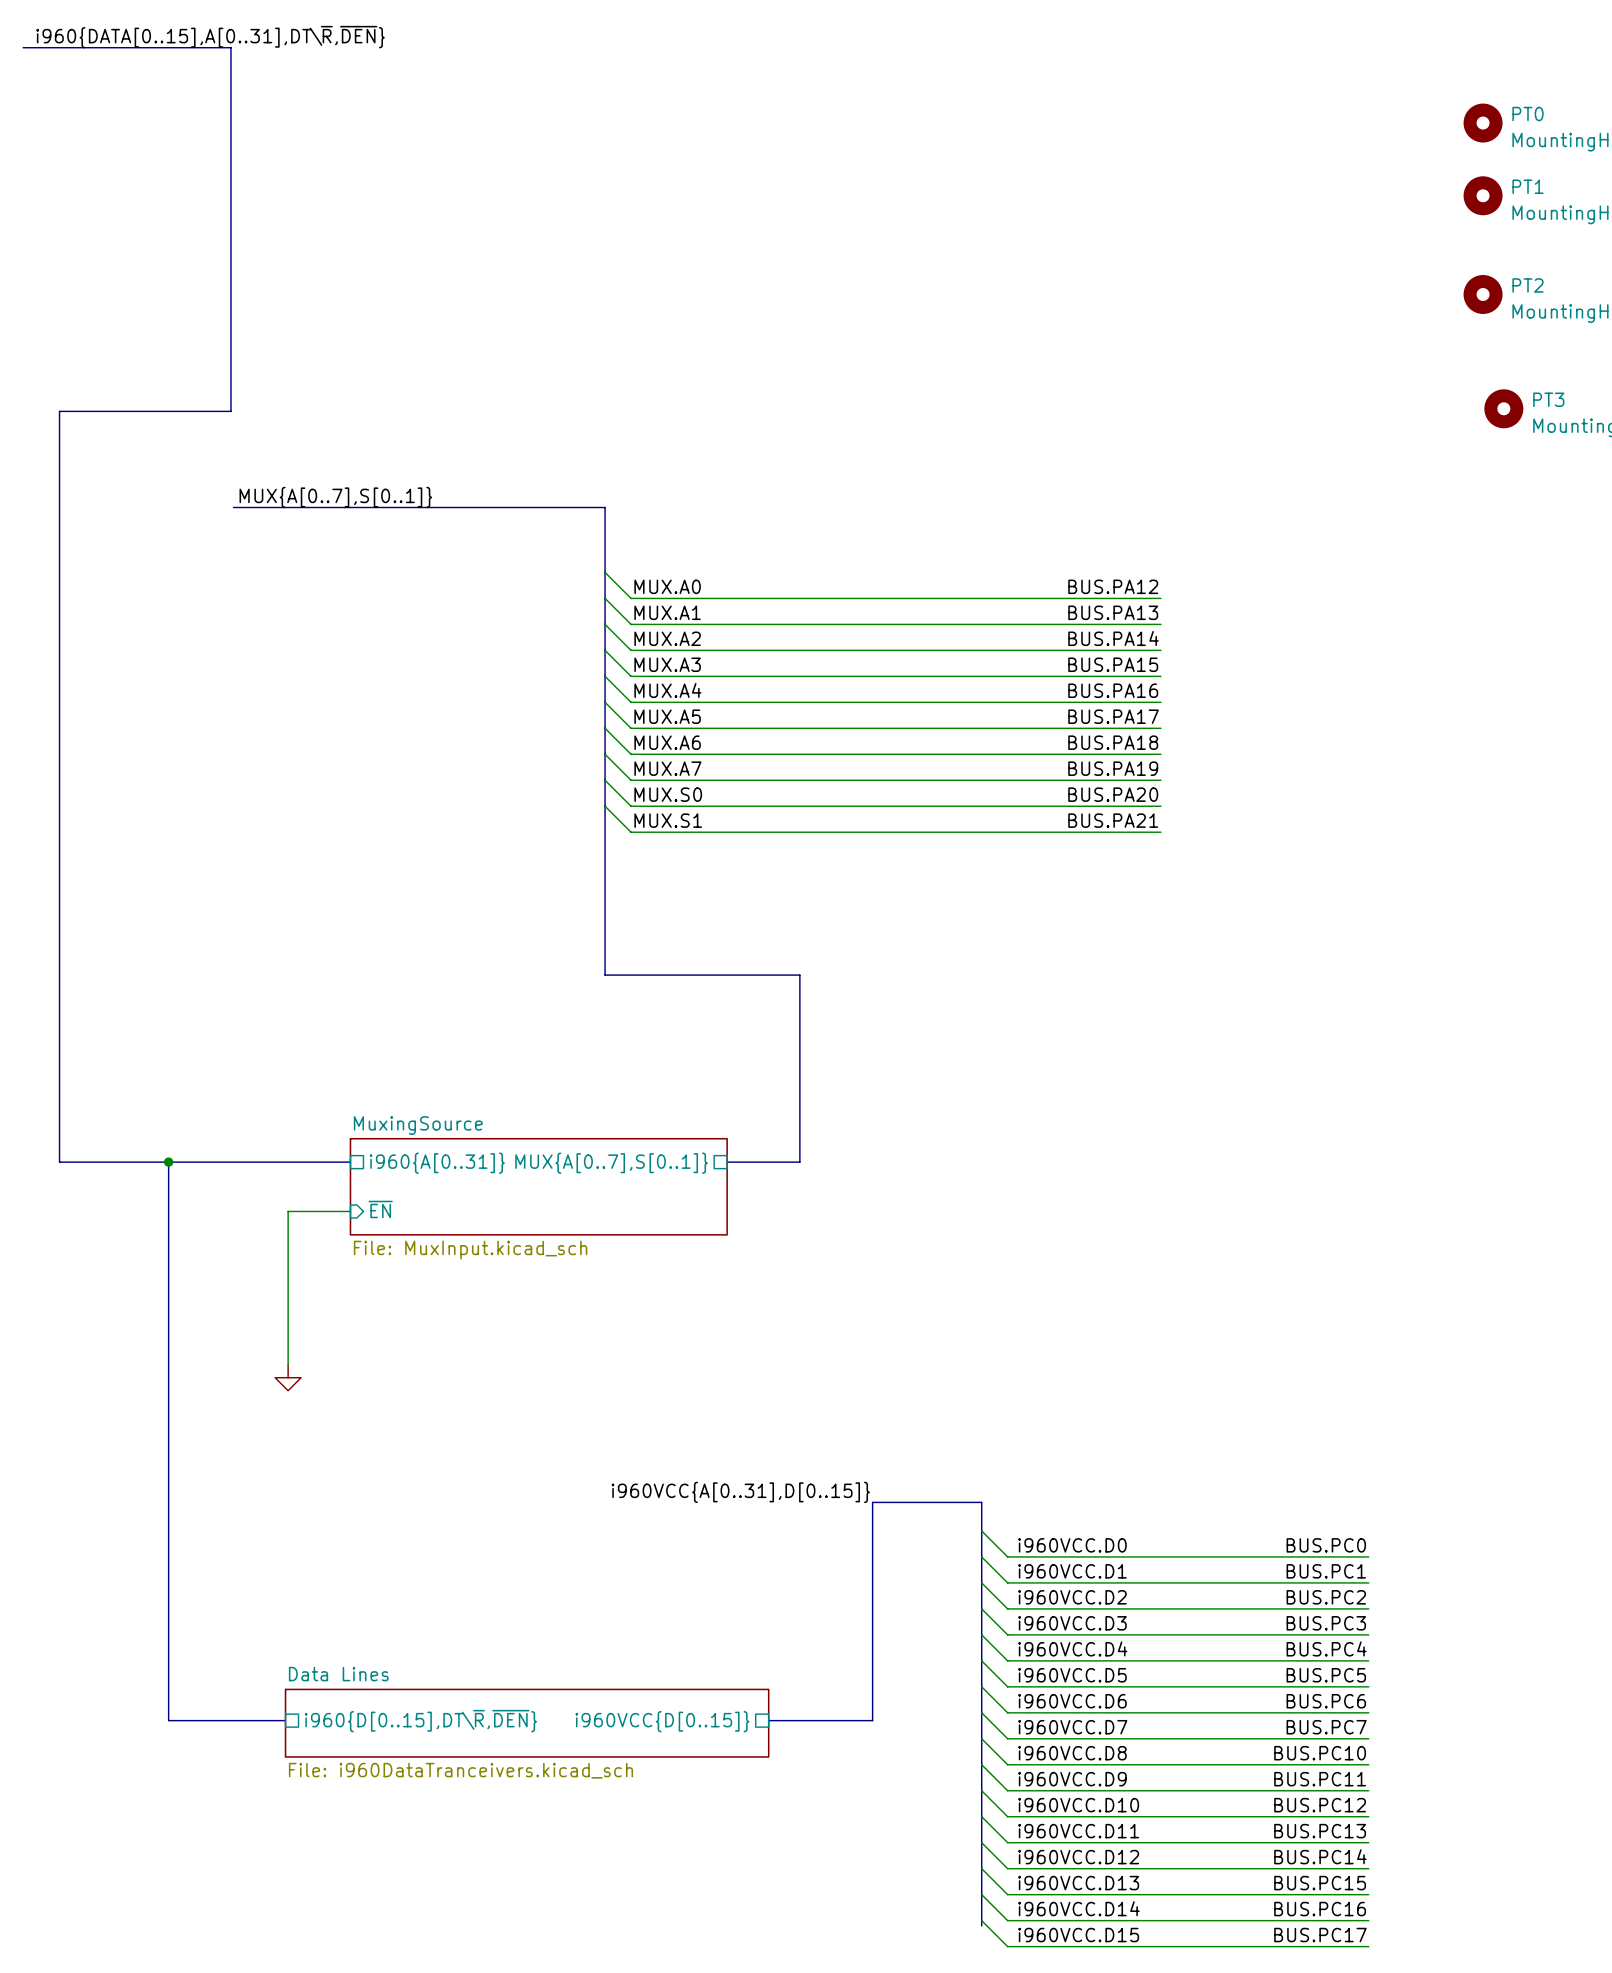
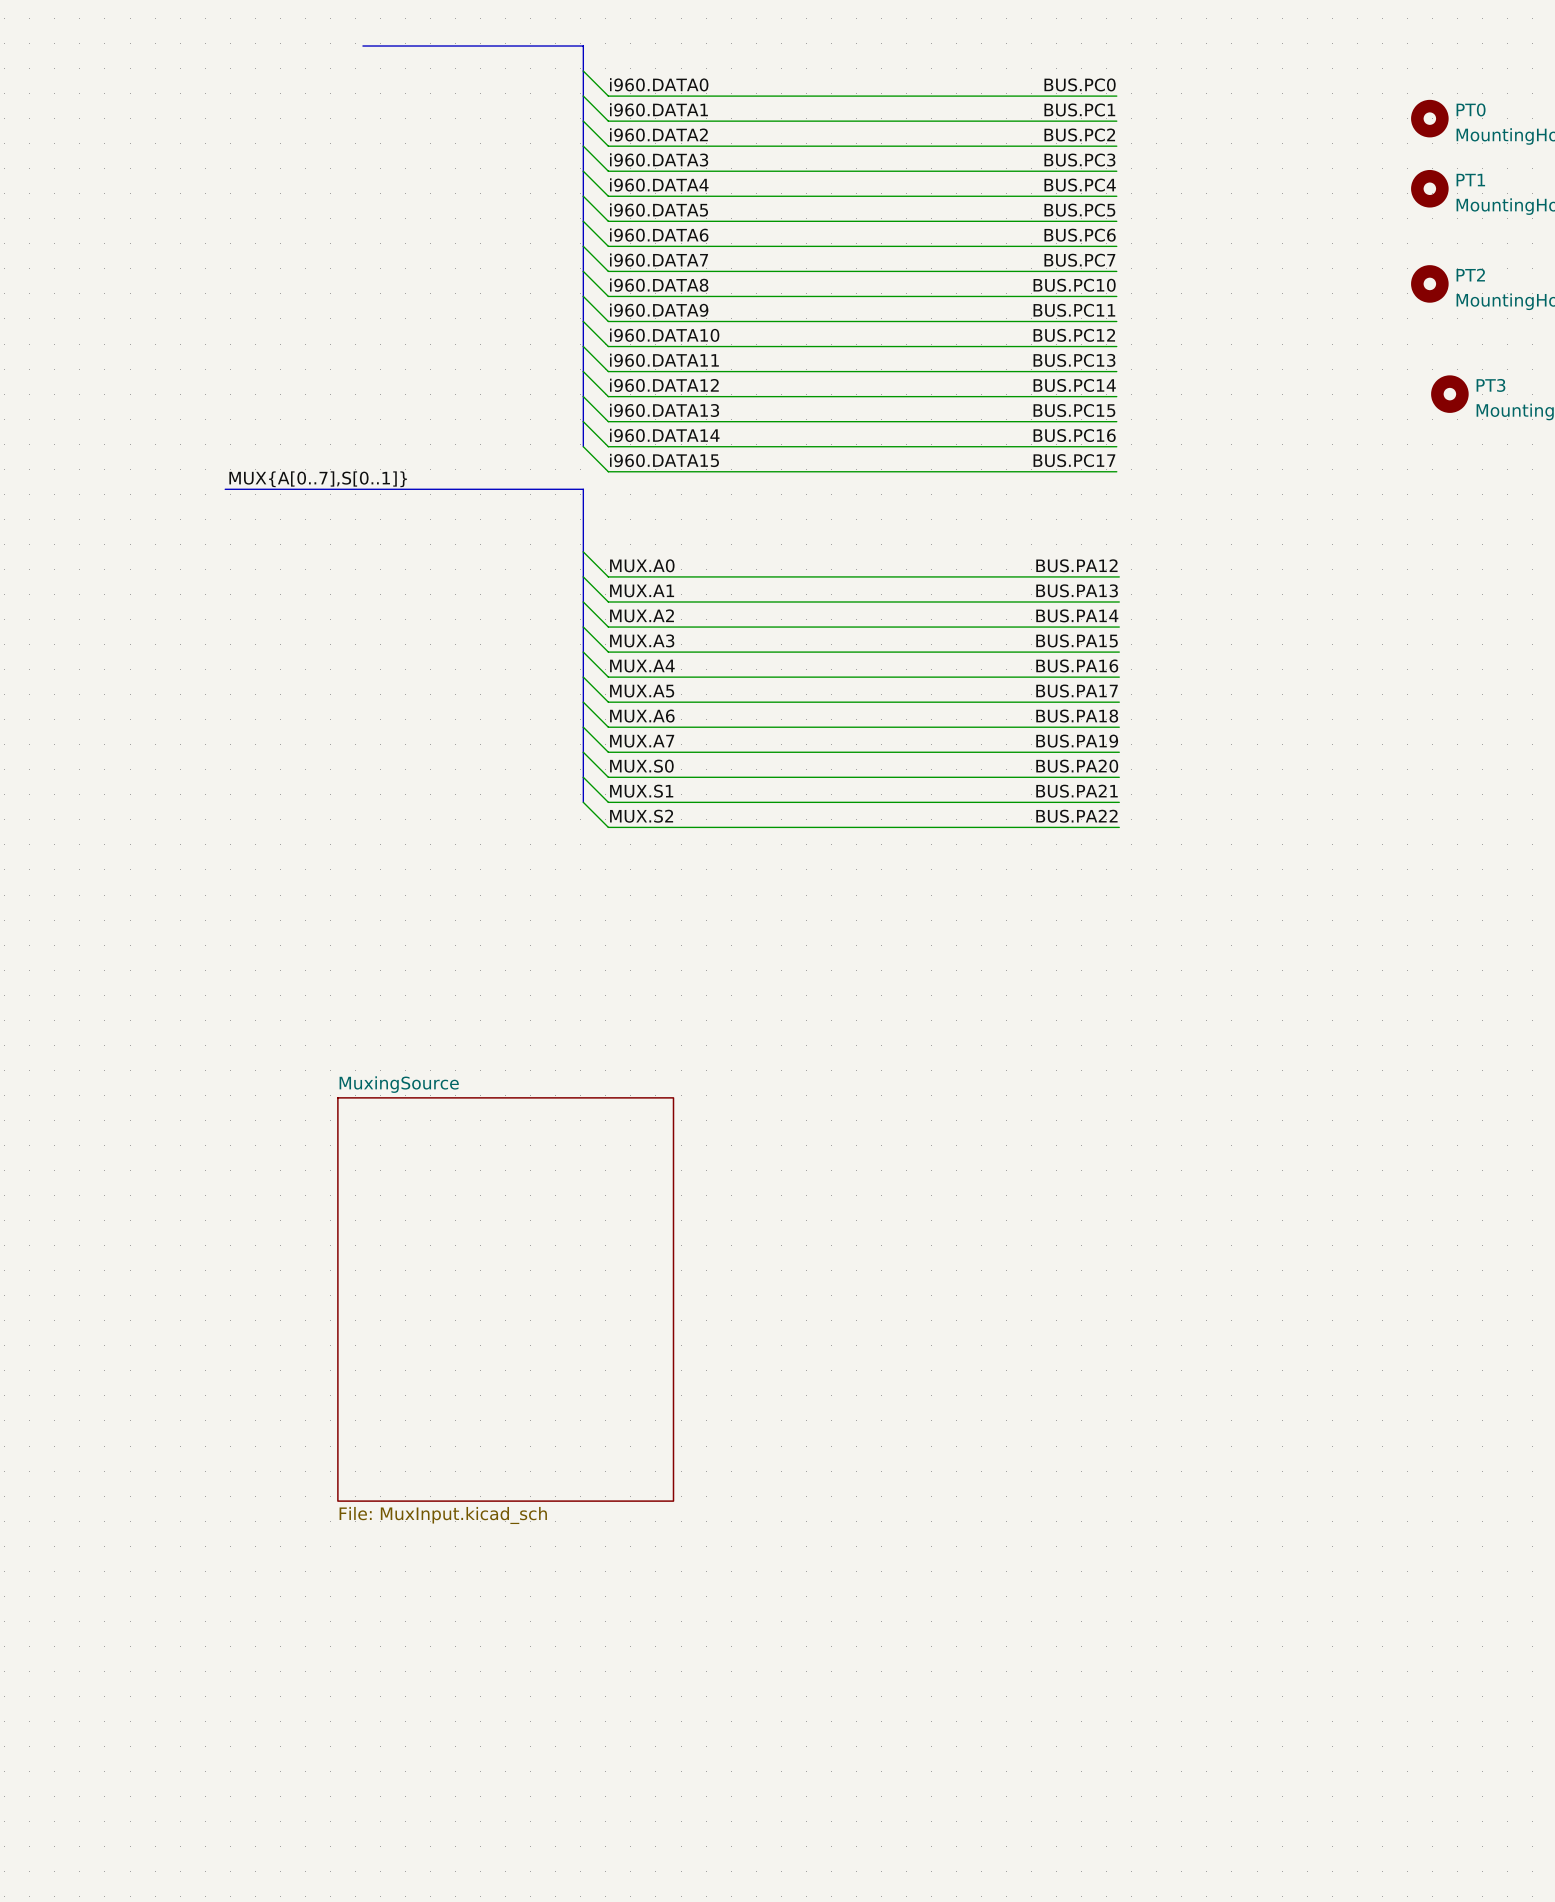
label: i960{DATA[0..15],A[0..31],DT\~{R},~{DEN}} (210, 37) -> none
bus: (23, 47) (230, 47) (230, 411) (59, 411) (59, 1162) (350, 1162) -> none
bus: none -> (362, 46) (583, 46) (583, 446)
wire: none -> (583, 71) (608, 96) (1116, 96)
label: none -> i960.DATA0 (659, 84)
label: none -> BUS.PC0 (1080, 84)
wire: none -> (583, 96) (608, 121) (1116, 121)
label: none -> i960.DATA1 (658, 109)
label: none -> BUS.PC1 (1079, 109)
wire: none -> (583, 121) (608, 146) (1116, 146)
label: none -> i960.DATA2 (658, 134)
label: none -> BUS.PC2 (1079, 135)
wire: none -> (583, 146) (608, 171) (1116, 171)
label: none -> i960.DATA3 (659, 159)
label: none -> BUS.PC3 (1079, 160)
wire: none -> (583, 171) (608, 196) (1116, 196)
label: none -> i960.DATA4 (659, 184)
label: none -> BUS.PC4 (1080, 185)
wire: none -> (583, 196) (608, 221) (1116, 221)
label: none -> i960.DATA5 (659, 210)
label: none -> BUS.PC5 (1079, 210)
wire: none -> (583, 221) (608, 246) (1116, 246)
label: none -> i960.DATA6 (659, 235)
label: none -> BUS.PC6 (1080, 235)
wire: none -> (583, 246) (608, 271) (1116, 271)
label: none -> i960.DATA7 (659, 260)
label: none -> BUS.PC7 (1079, 260)
wire: none -> (583, 271) (608, 296) (1116, 296)
label: none -> i960.DATA8 (659, 285)
label: none -> BUS.PC10 (1074, 285)
wire: none -> (583, 296) (608, 321) (1116, 321)
label: none -> i960.DATA9 (659, 310)
label: none -> BUS.PC11 (1074, 310)
wire: none -> (583, 321) (608, 346) (1116, 346)
label: none -> i960.DATA10 (664, 335)
label: none -> BUS.PC12 (1074, 335)
wire: none -> (583, 346) (608, 371) (1116, 371)
label: none -> i960.DATA11 (664, 360)
label: none -> BUS.PC13 (1074, 360)
wire: none -> (583, 371) (608, 396) (1116, 396)
label: none -> i960.DATA12 (664, 385)
label: none -> BUS.PC14 (1074, 385)
wire: none -> (583, 396) (608, 421) (1116, 421)
label: none -> i960.DATA13 (664, 410)
label: none -> BUS.PC15 (1074, 410)
wire: none -> (583, 421) (608, 446) (1116, 446)
label: none -> i960.DATA14 (664, 435)
label: none -> BUS.PC16 (1074, 435)
wire: none -> (583, 446) (608, 471) (1116, 471)
label: none -> i960.DATA15 (664, 460)
label: none -> BUS.PC17 (1074, 460)
wire: none -> (583, 802) (608, 827) (1119, 827)
bus: (605, 832) (605, 975) (799, 975) (799, 1162) (727, 1162) -> none
label: none -> MUX.S2 (641, 816)
label: none -> BUS.PA22 (1076, 816)
bus: (168, 1162) (168, 1720) (285, 1720) -> none
junction: (168, 1162) -> none
sheet pin: i960{A[0..31]} (437, 1163) -> none
sheet pin: MUX{A[0..7],S[0..1]} (611, 1163) -> none
sheet MuxingSource: File: MuxInput.kicad_sch (538, 1186) -> none
sheet pin: ~{EN} (380, 1209) -> none
wire: (350, 1211) (288, 1211) (288, 1364) -> none
sheet MuxingSource: none -> File: MuxInput.kicad_sch (505, 1299)
power symbol: (288, 1377) -> none
label: i960VCC{A[0..31],D[0..15]} (740, 1492) -> none
wire: (981, 1530) (1007, 1556) (1368, 1556) -> none
label: i960VCC.D0 (1072, 1545) -> none
label: BUS.PC0 (1326, 1545) -> none
wire: (981, 1556) (1007, 1582) (1368, 1582) -> none
label: i960VCC.D1 (1072, 1571) -> none
label: BUS.PC1 (1326, 1571) -> none
wire: (981, 1582) (1007, 1608) (1368, 1608) -> none
label: i960VCC.D2 (1072, 1597) -> none
label: BUS.PC2 (1326, 1597) -> none
wire: (981, 1608) (1007, 1634) (1368, 1634) -> none
label: i960VCC.D3 (1072, 1623) -> none
label: BUS.PC3 (1326, 1623) -> none
wire: (981, 1634) (1007, 1660) (1368, 1660) -> none
label: i960VCC.D4 (1072, 1648) -> none
label: BUS.PC4 (1326, 1648) -> none
wire: (981, 1660) (1007, 1686) (1368, 1686) -> none
label: i960VCC.D5 (1072, 1675) -> none
label: BUS.PC5 (1326, 1675) -> none
wire: (981, 1686) (1007, 1712) (1368, 1712) -> none
label: i960VCC.D6 (1072, 1701) -> none
label: BUS.PC6 (1326, 1701) -> none
wire: (981, 1712) (1007, 1738) (1368, 1738) -> none
bus: (768, 1720) (872, 1720) (872, 1502) (981, 1502) (981, 1925) -> none
sheet pin: i960{D[0..15],DT\~{R},~{DEN}} (420, 1721) -> none
sheet pin: i960VCC{D[0..15]} (662, 1721) -> none
sheet Data Lines: File: i960DataTranceivers.kicad_sch (527, 1723) -> none
label: i960VCC.D7 (1072, 1727) -> none
label: BUS.PC7 (1326, 1727) -> none
wire: (981, 1738) (1007, 1764) (1368, 1764) -> none
label: i960VCC.D8 (1072, 1753) -> none
label: BUS.PC10 (1320, 1753) -> none
wire: (981, 1764) (1007, 1790) (1368, 1790) -> none
label: i960VCC.D9 (1072, 1779) -> none
label: BUS.PC11 (1320, 1779) -> none
wire: (981, 1790) (1007, 1816) (1368, 1816) -> none
label: i960VCC.D10 (1078, 1805) -> none
label: BUS.PC12 (1320, 1805) -> none
wire: (981, 1816) (1007, 1842) (1368, 1842) -> none
label: i960VCC.D11 (1078, 1831) -> none
label: BUS.PC13 (1320, 1831) -> none
wire: (981, 1842) (1007, 1868) (1368, 1868) -> none
label: BUS.PC14 (1320, 1856) -> none
label: i960VCC.D12 (1078, 1857) -> none
wire: (981, 1868) (1007, 1894) (1368, 1894) -> none
label: i960VCC.D13 (1078, 1883) -> none
label: BUS.PC15 (1320, 1883) -> none
wire: (981, 1894) (1007, 1920) (1368, 1920) -> none
label: i960VCC.D14 (1078, 1908) -> none
label: BUS.PC16 (1320, 1909) -> none
wire: (981, 1920) (1007, 1946) (1368, 1946) -> none
label: i960VCC.D15 (1078, 1935) -> none
label: BUS.PC17 (1320, 1935) -> none

